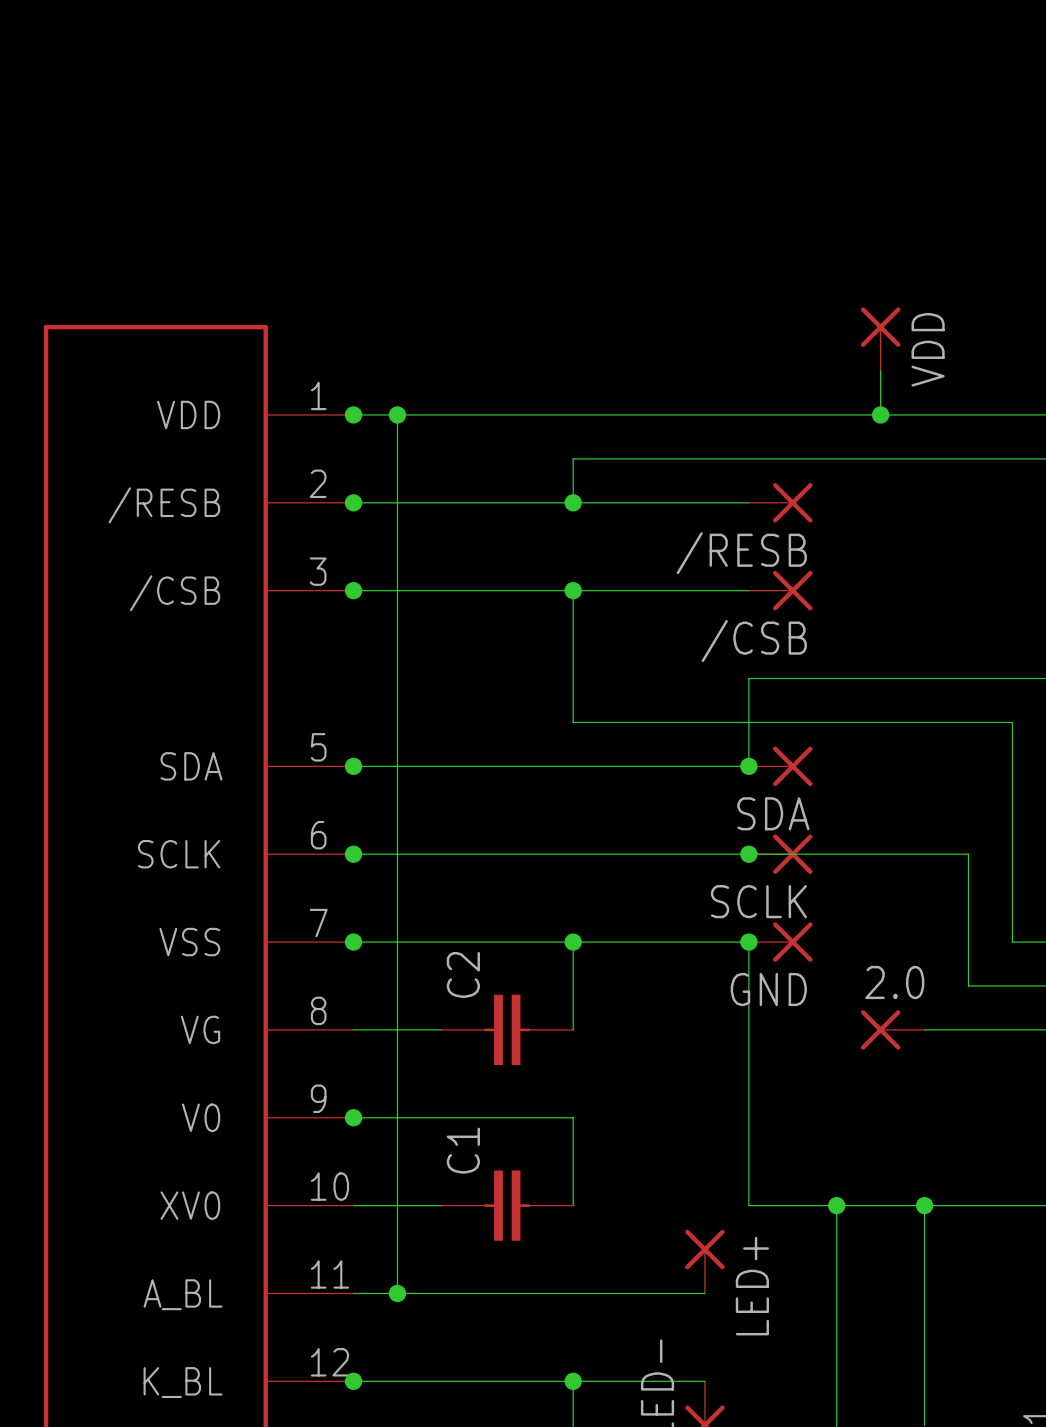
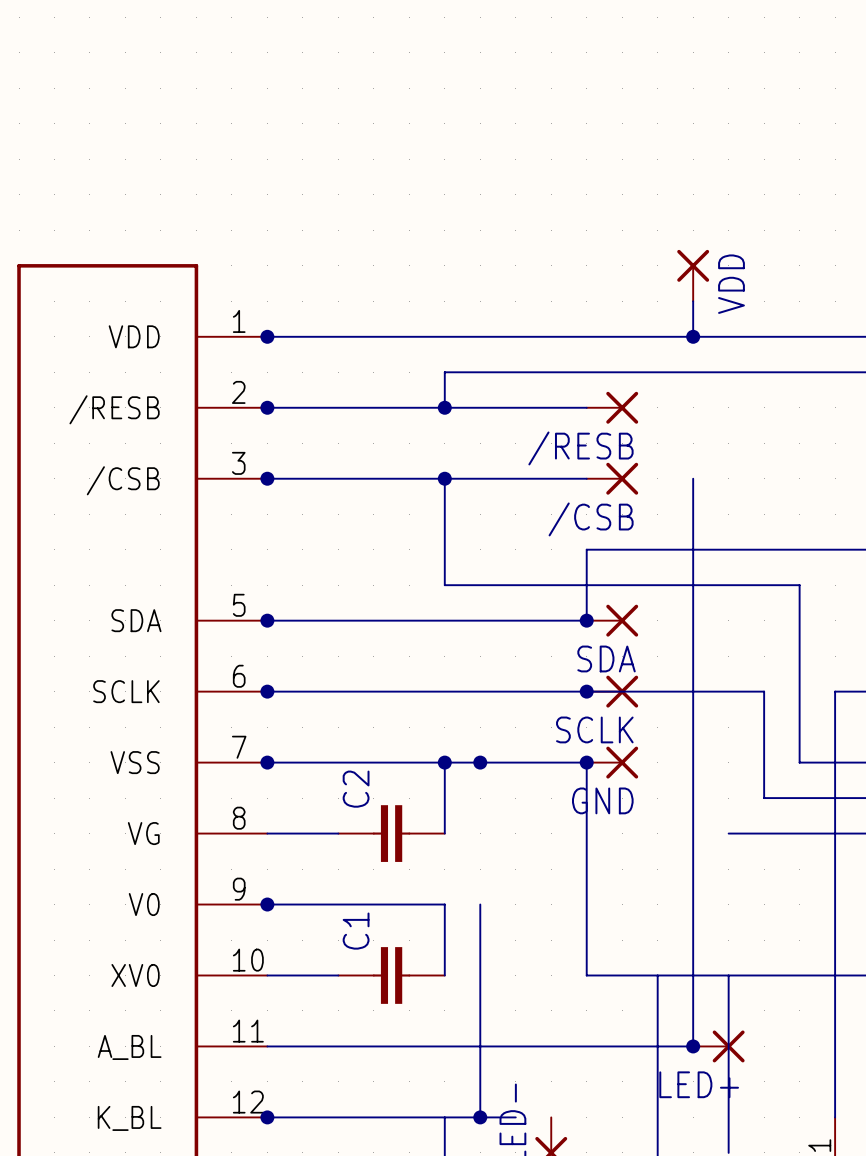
wire: (397, 414) (397, 1293) -> none
junction: (397, 414) -> none
wire: none -> (693, 478) (693, 1046) (551, 1046)
junction: none -> (480, 762)
2.0: (892, 1029) -> none
wire: none -> (480, 904) (480, 1117)
junction: (836, 1205) -> none
junction: (924, 1205) -> none
LED+ rotation: 0° (704, 1249) -> 90° clockwise (728, 1046)
LED+ position: (704, 1261) -> (718, 1046)
junction: (397, 1293) -> none
junction: none -> (693, 1046)
junction position: (573, 1381) -> (480, 1117)
wire: (661, 1381) (704, 1381) -> none

